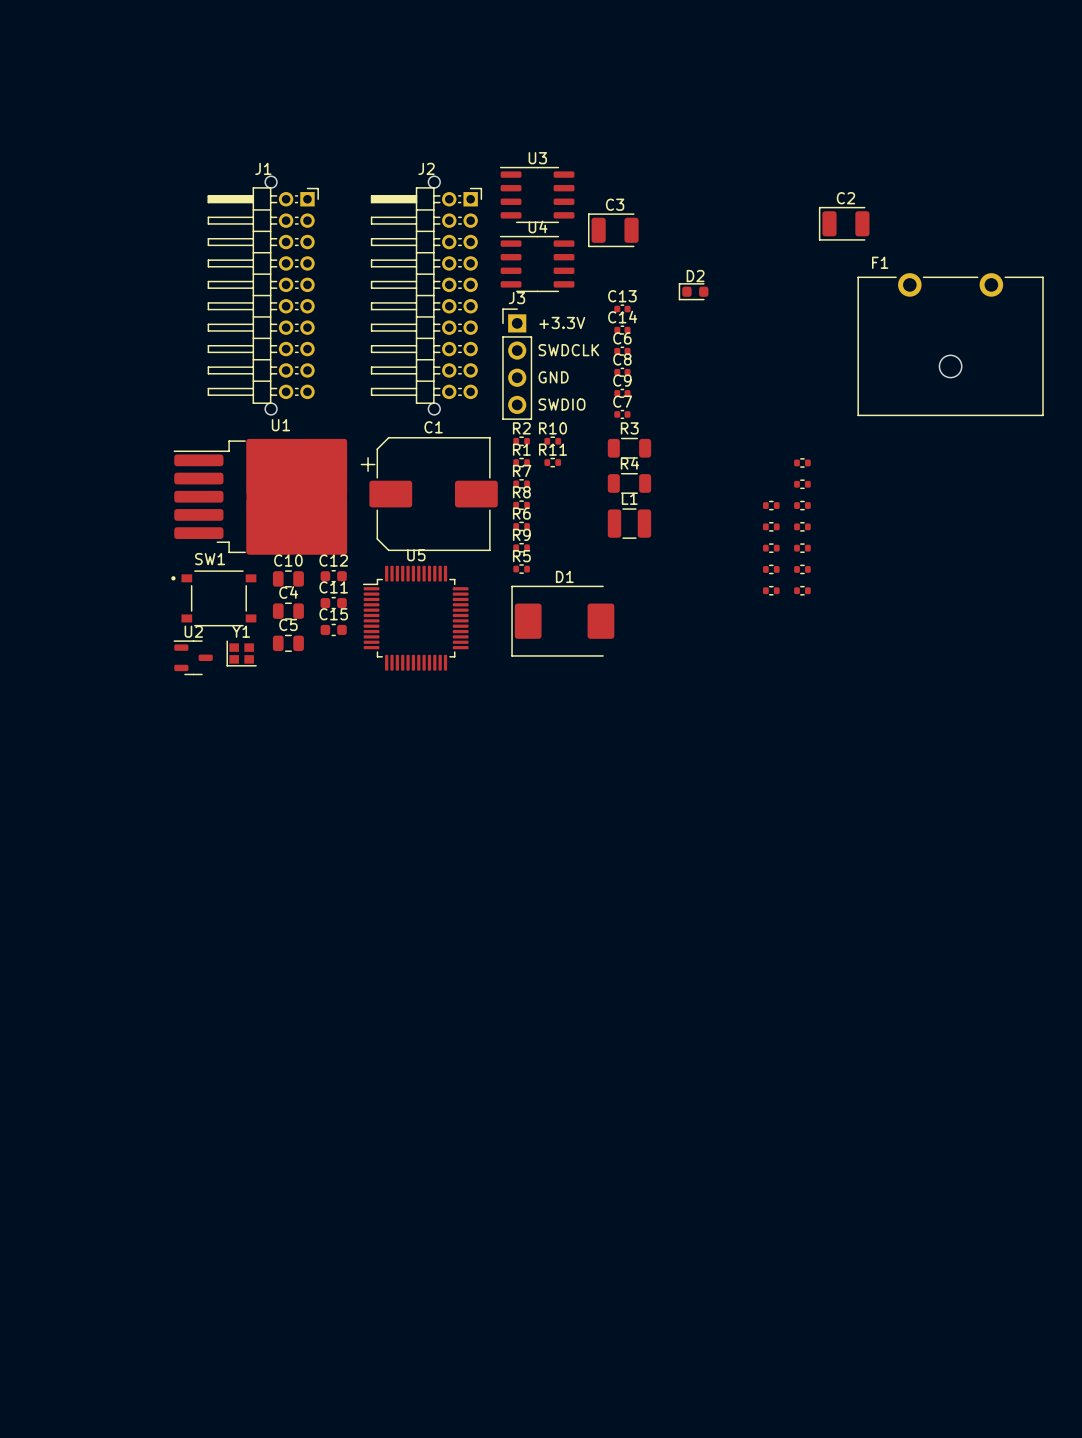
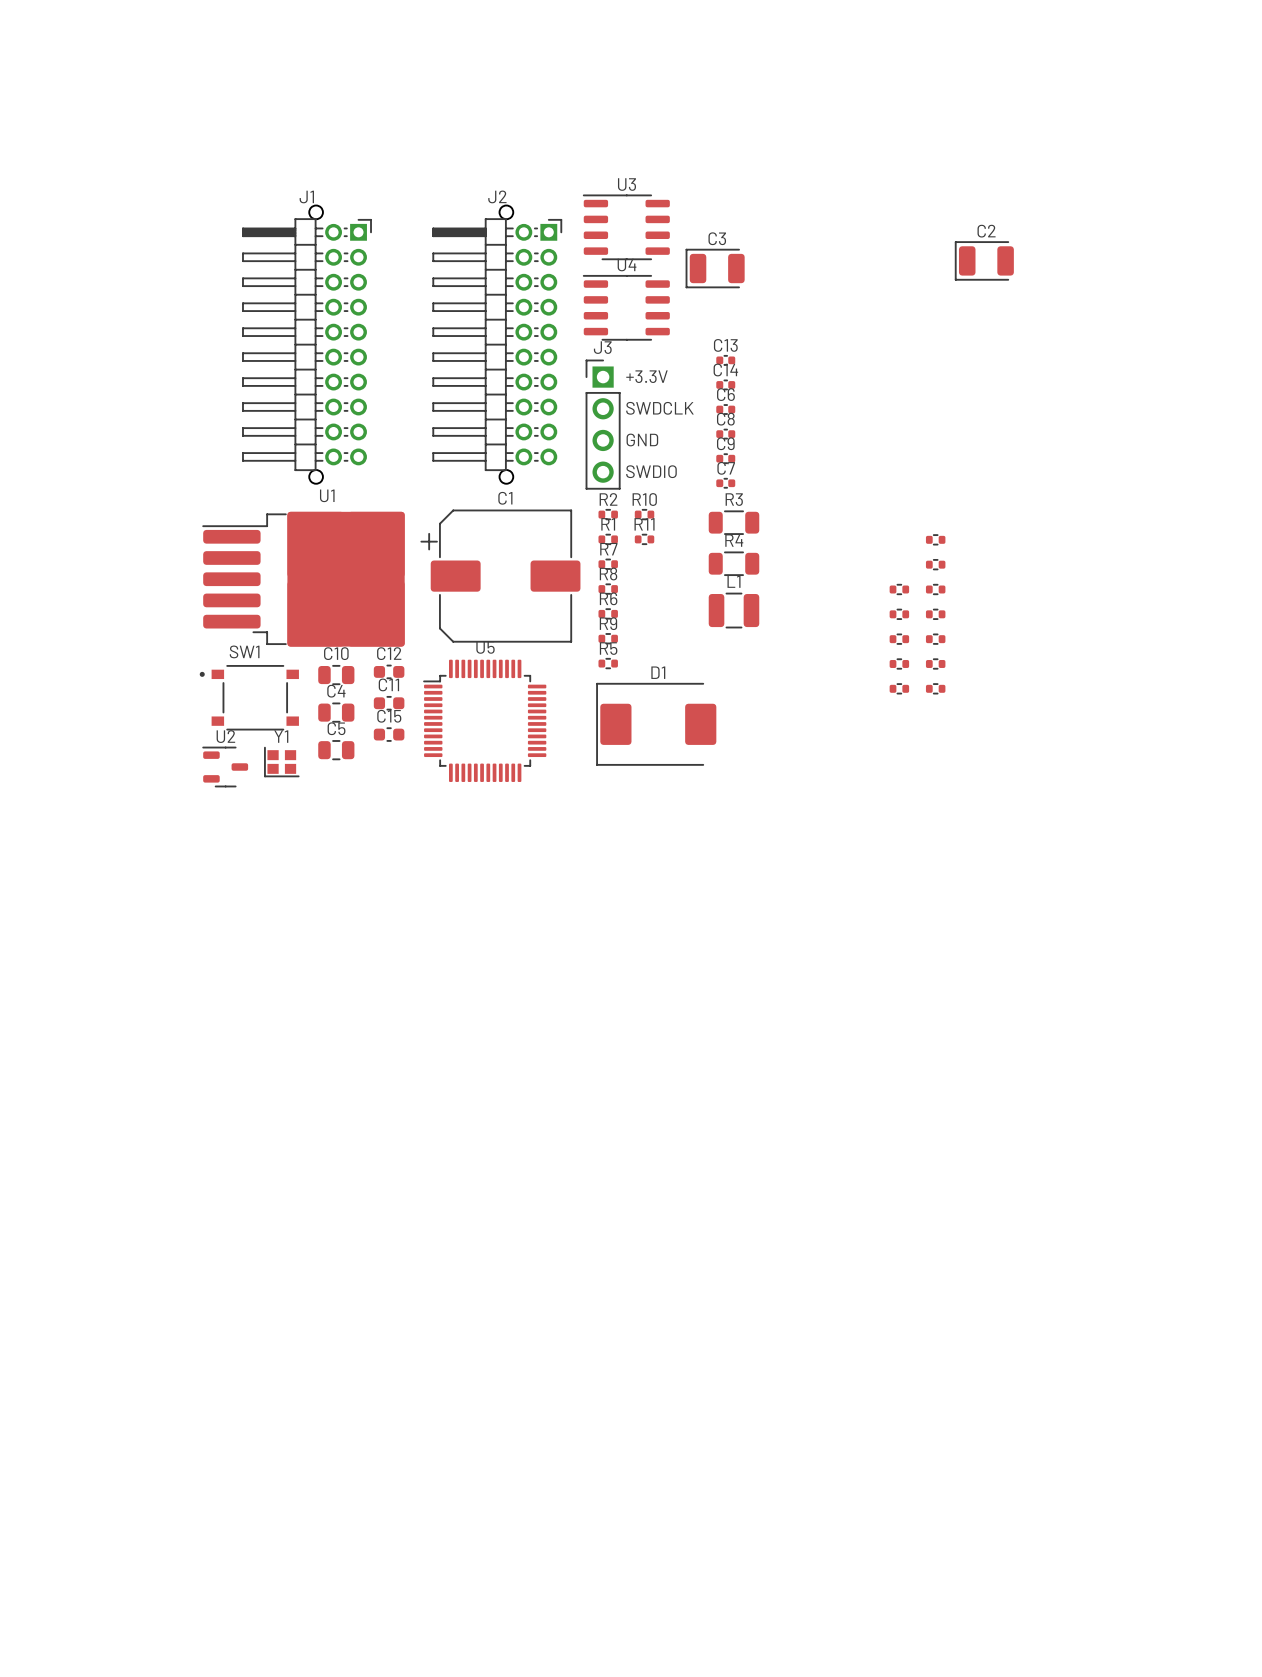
D2: (693, 291) -> none
F1: (950, 344) -> none

